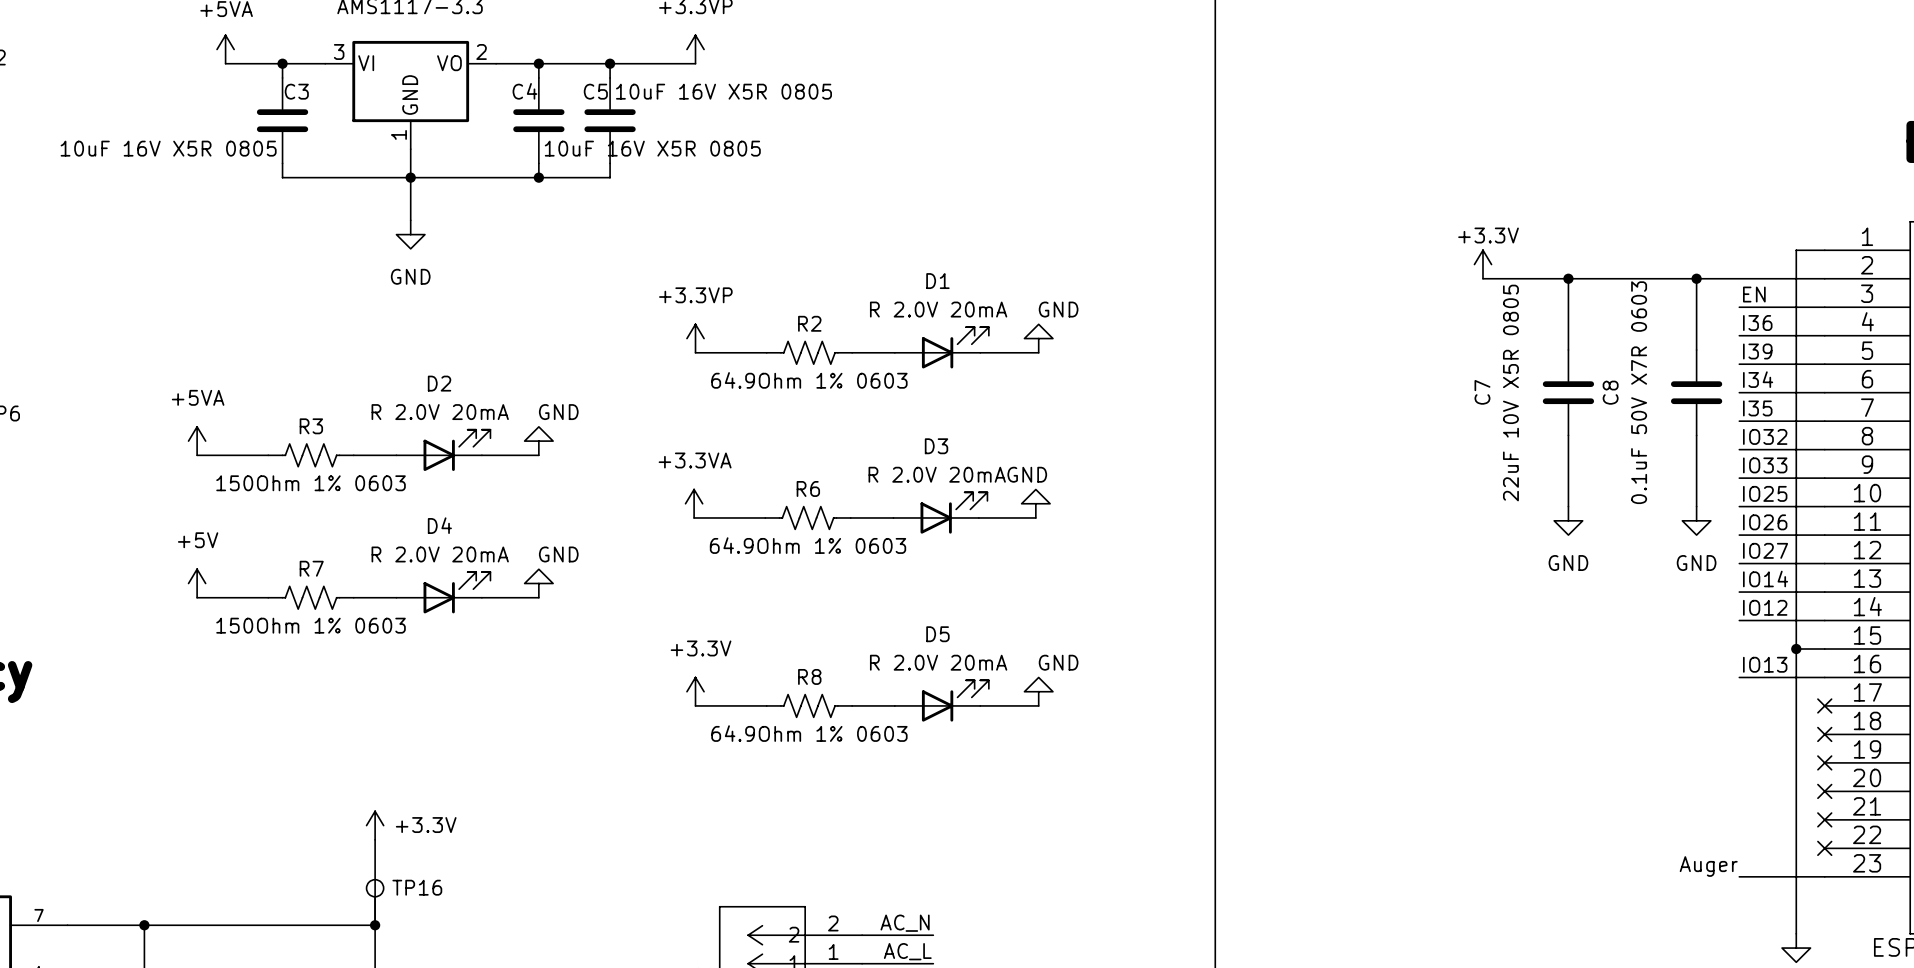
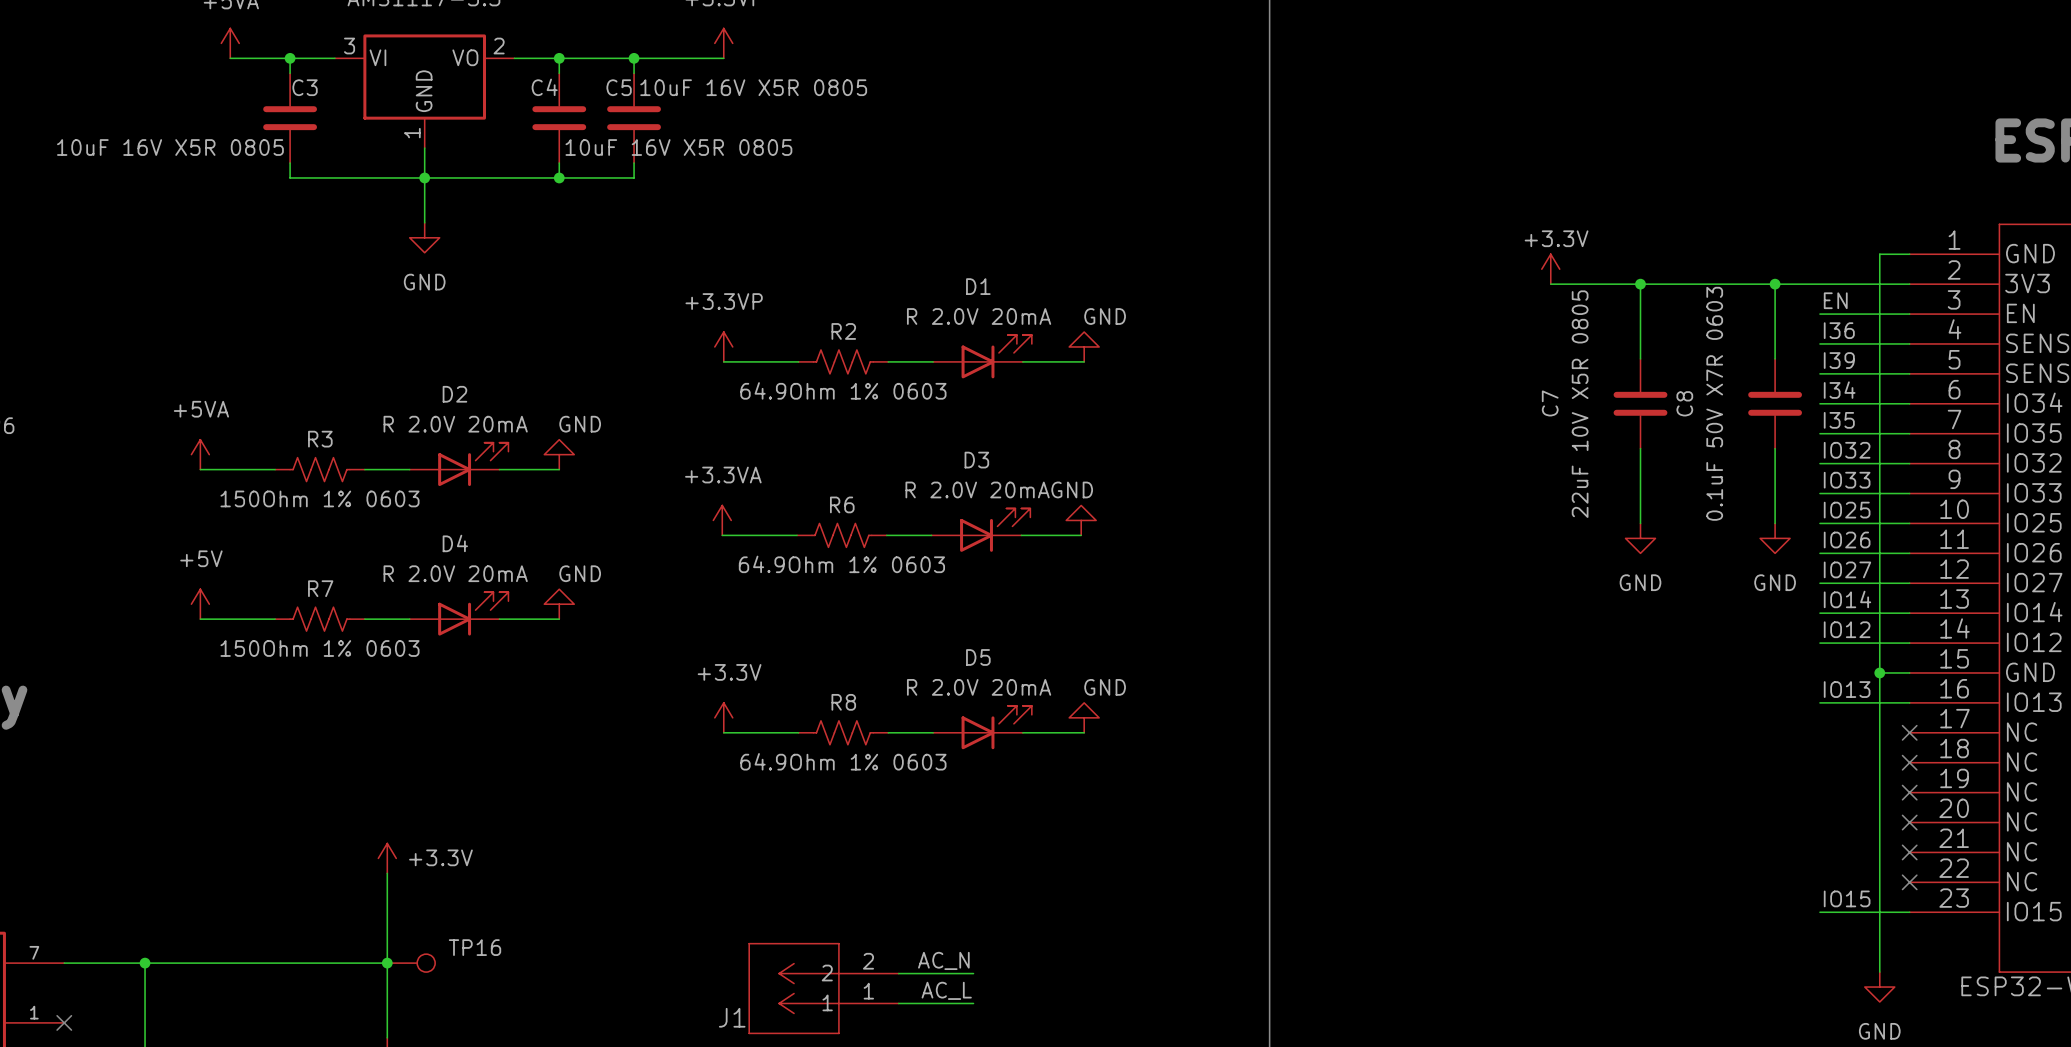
label: Auger (1708, 866) -> IO15 (1847, 898)
TP16 rotation: 0° (375, 888) -> 90° clockwise (426, 963)
TP16 position: (375, 902) -> (411, 963)

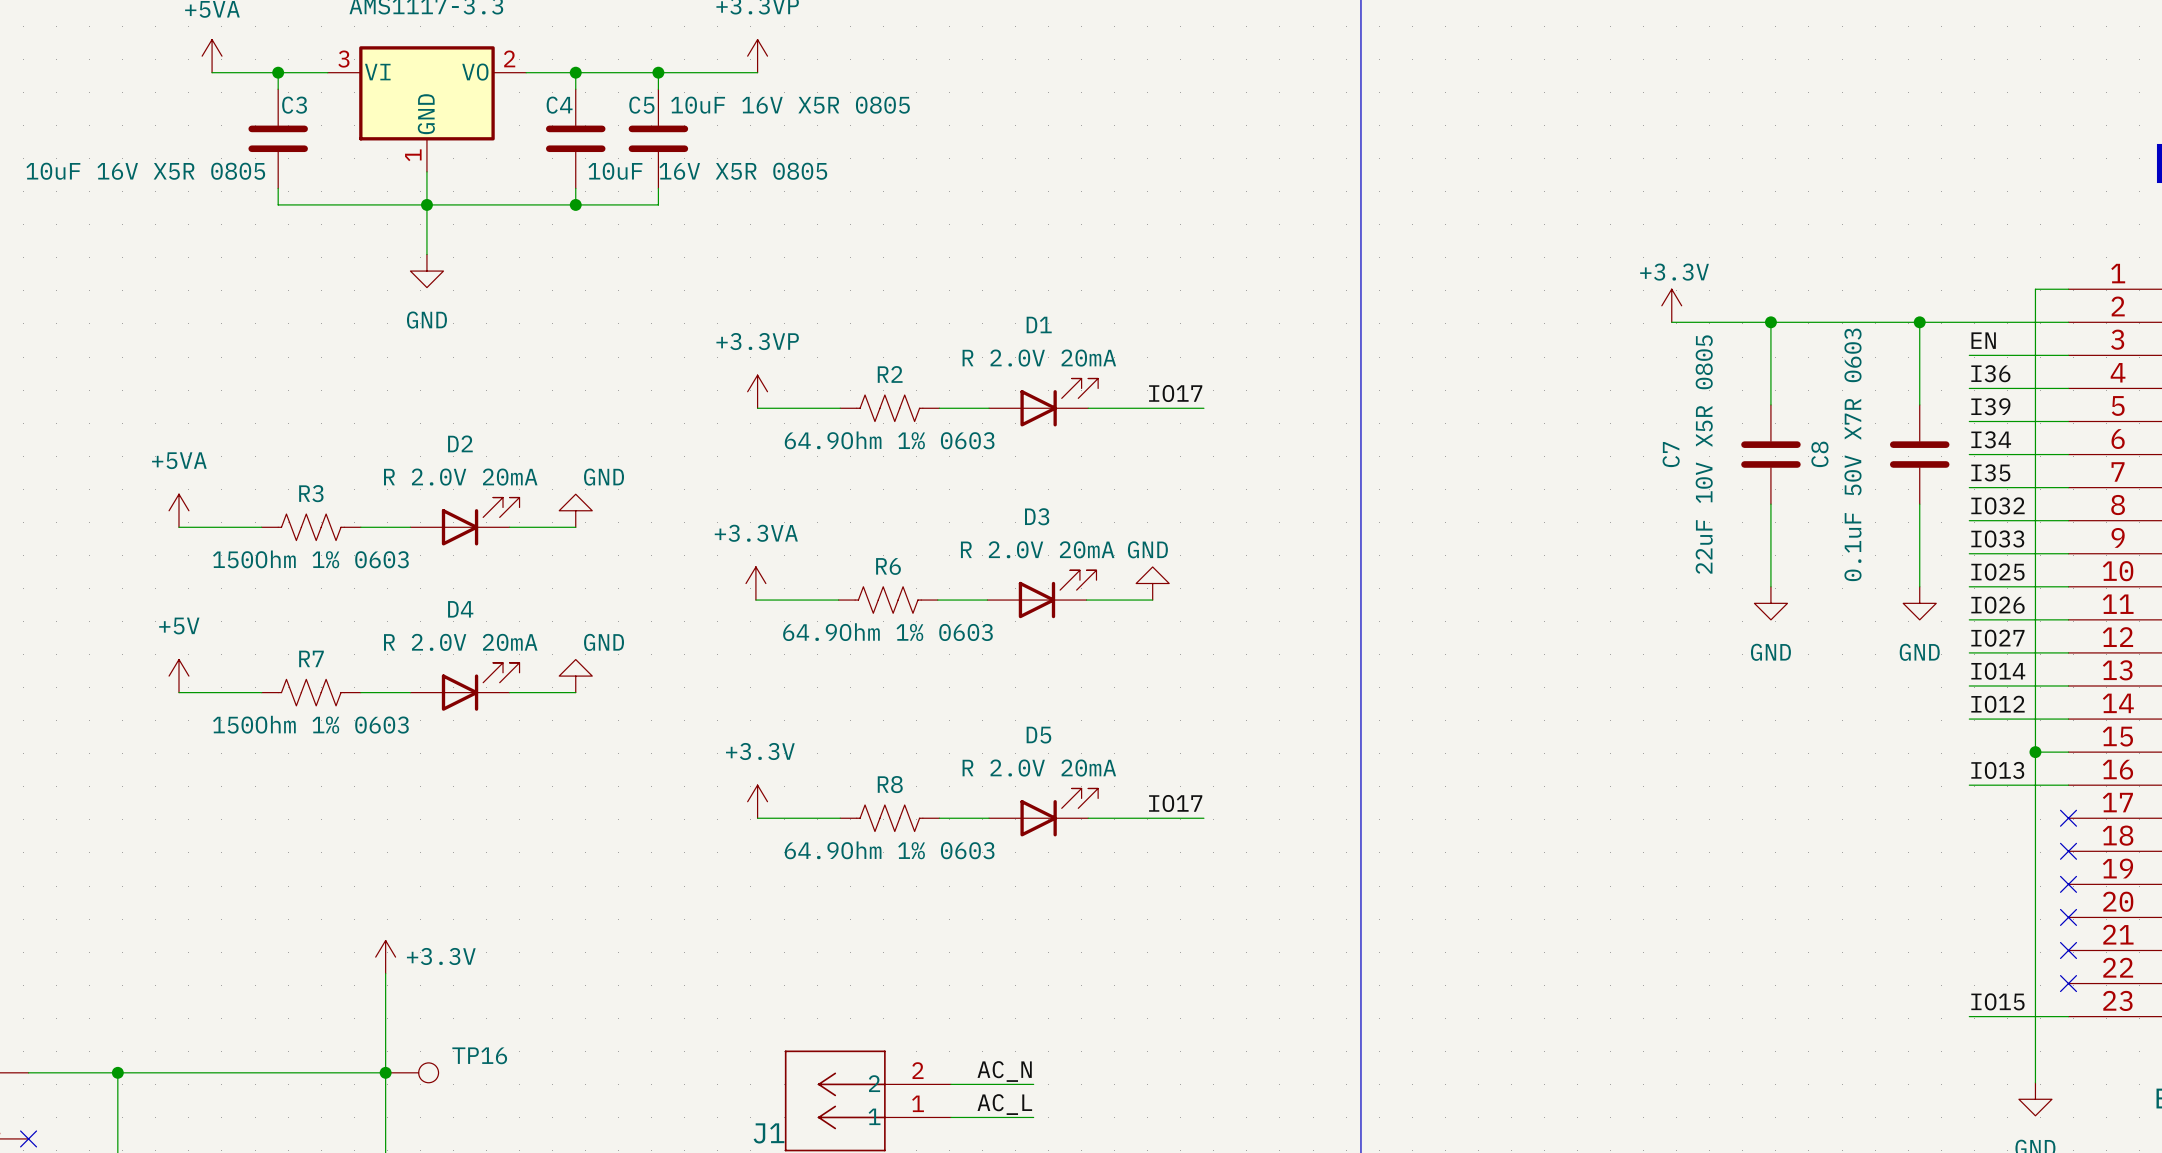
power symbol: GND (1084, 346) -> none
label: none -> IO17 (1175, 393)
wire: none -> (1155, 408) (1203, 408)
power symbol: GND (1084, 717) -> none
label: none -> IO17 (1175, 803)
wire: none -> (1155, 818) (1203, 818)

